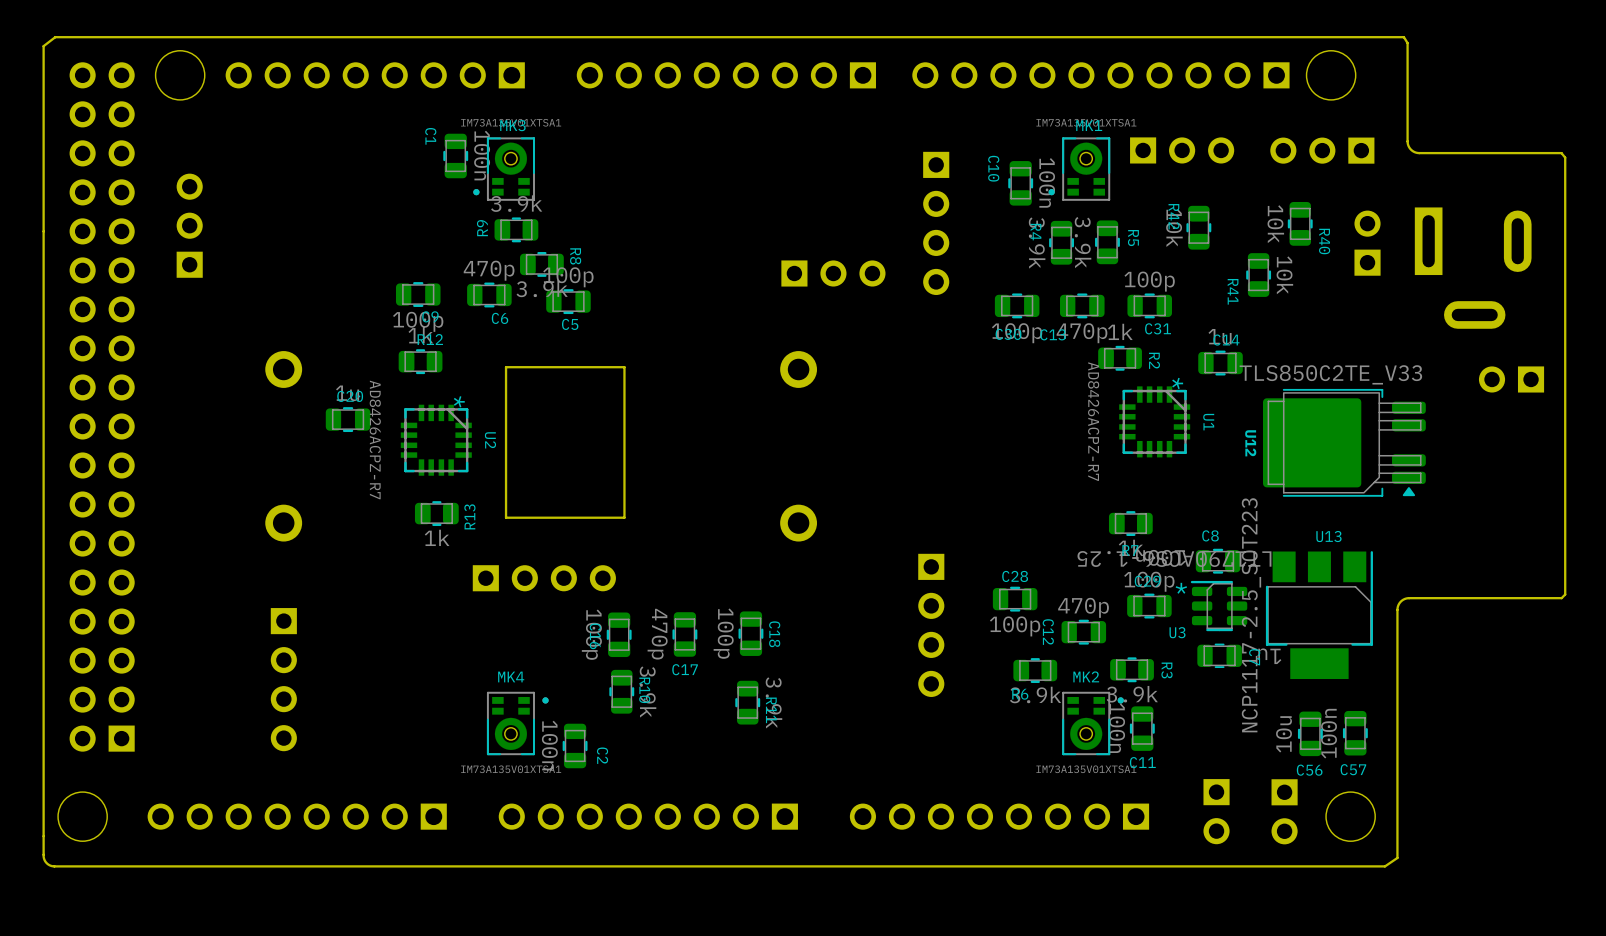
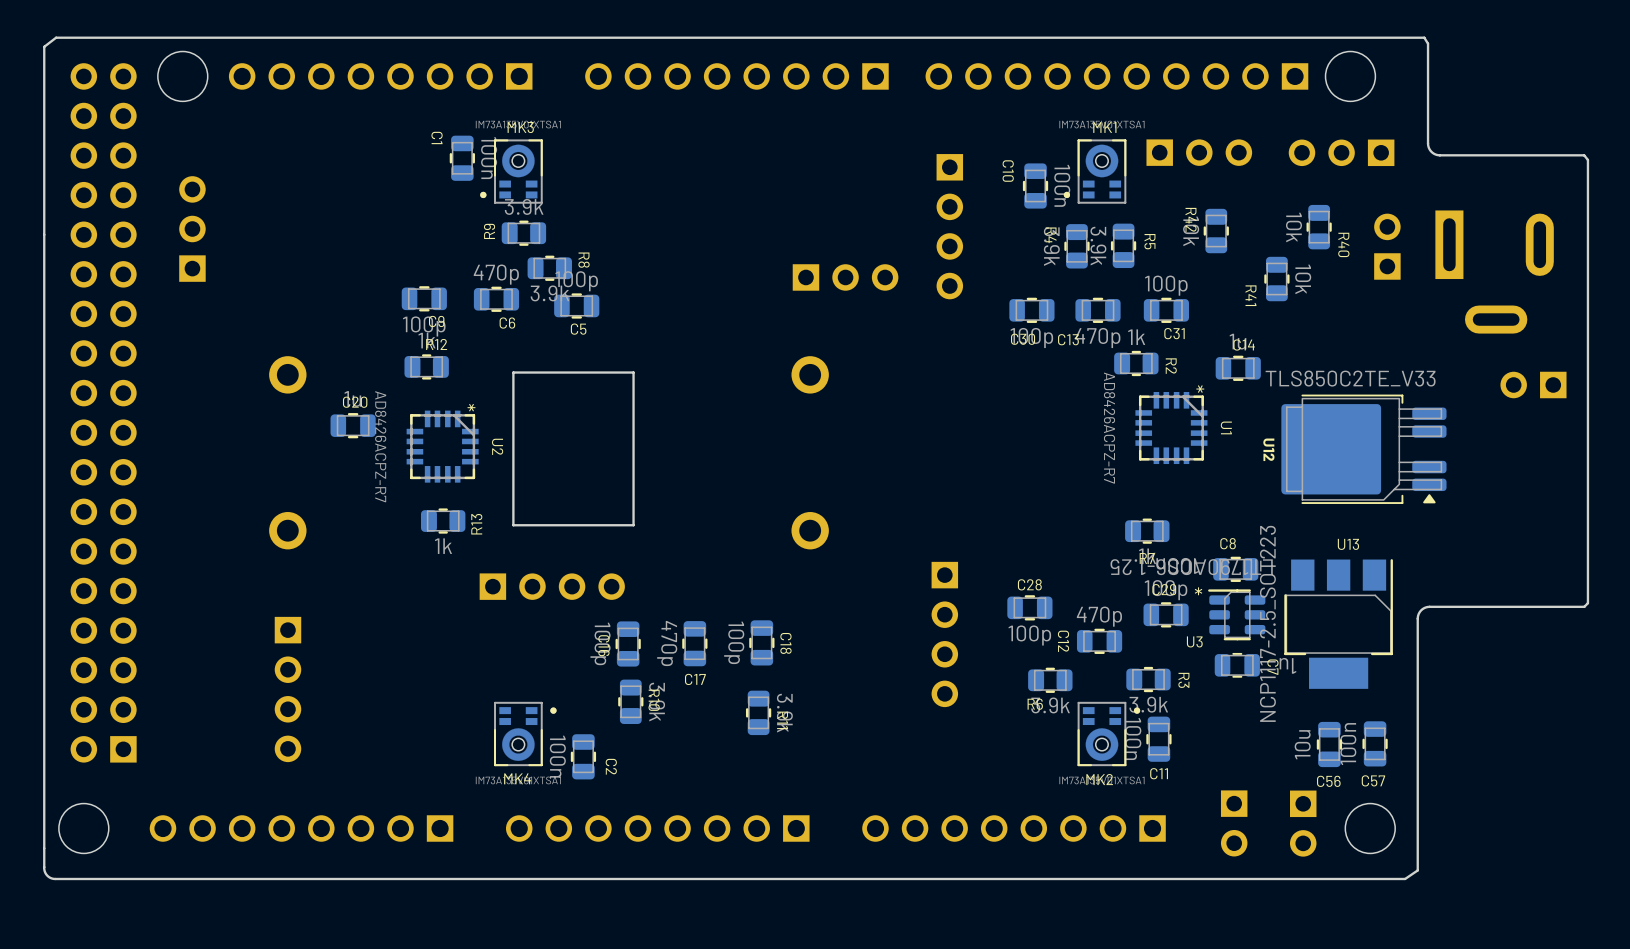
MK4 name position: MK4 (511, 676) -> MK4 (517, 778)
MK2 name position: MK2 (1086, 676) -> MK2 (1099, 779)

